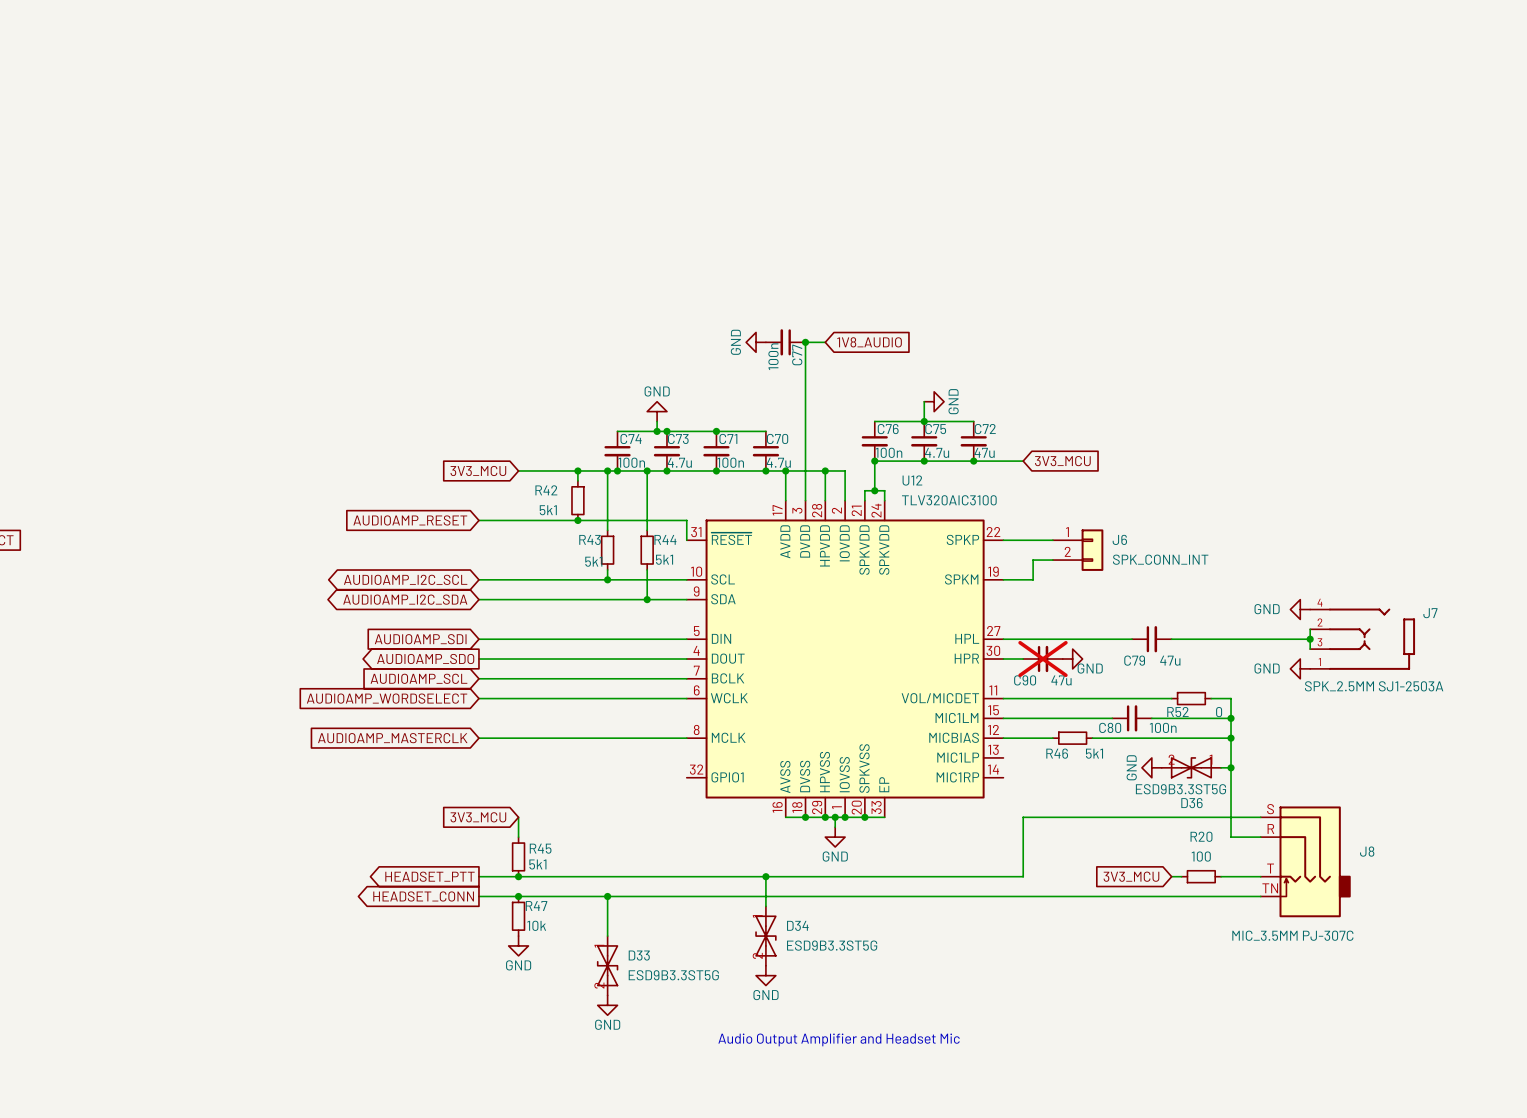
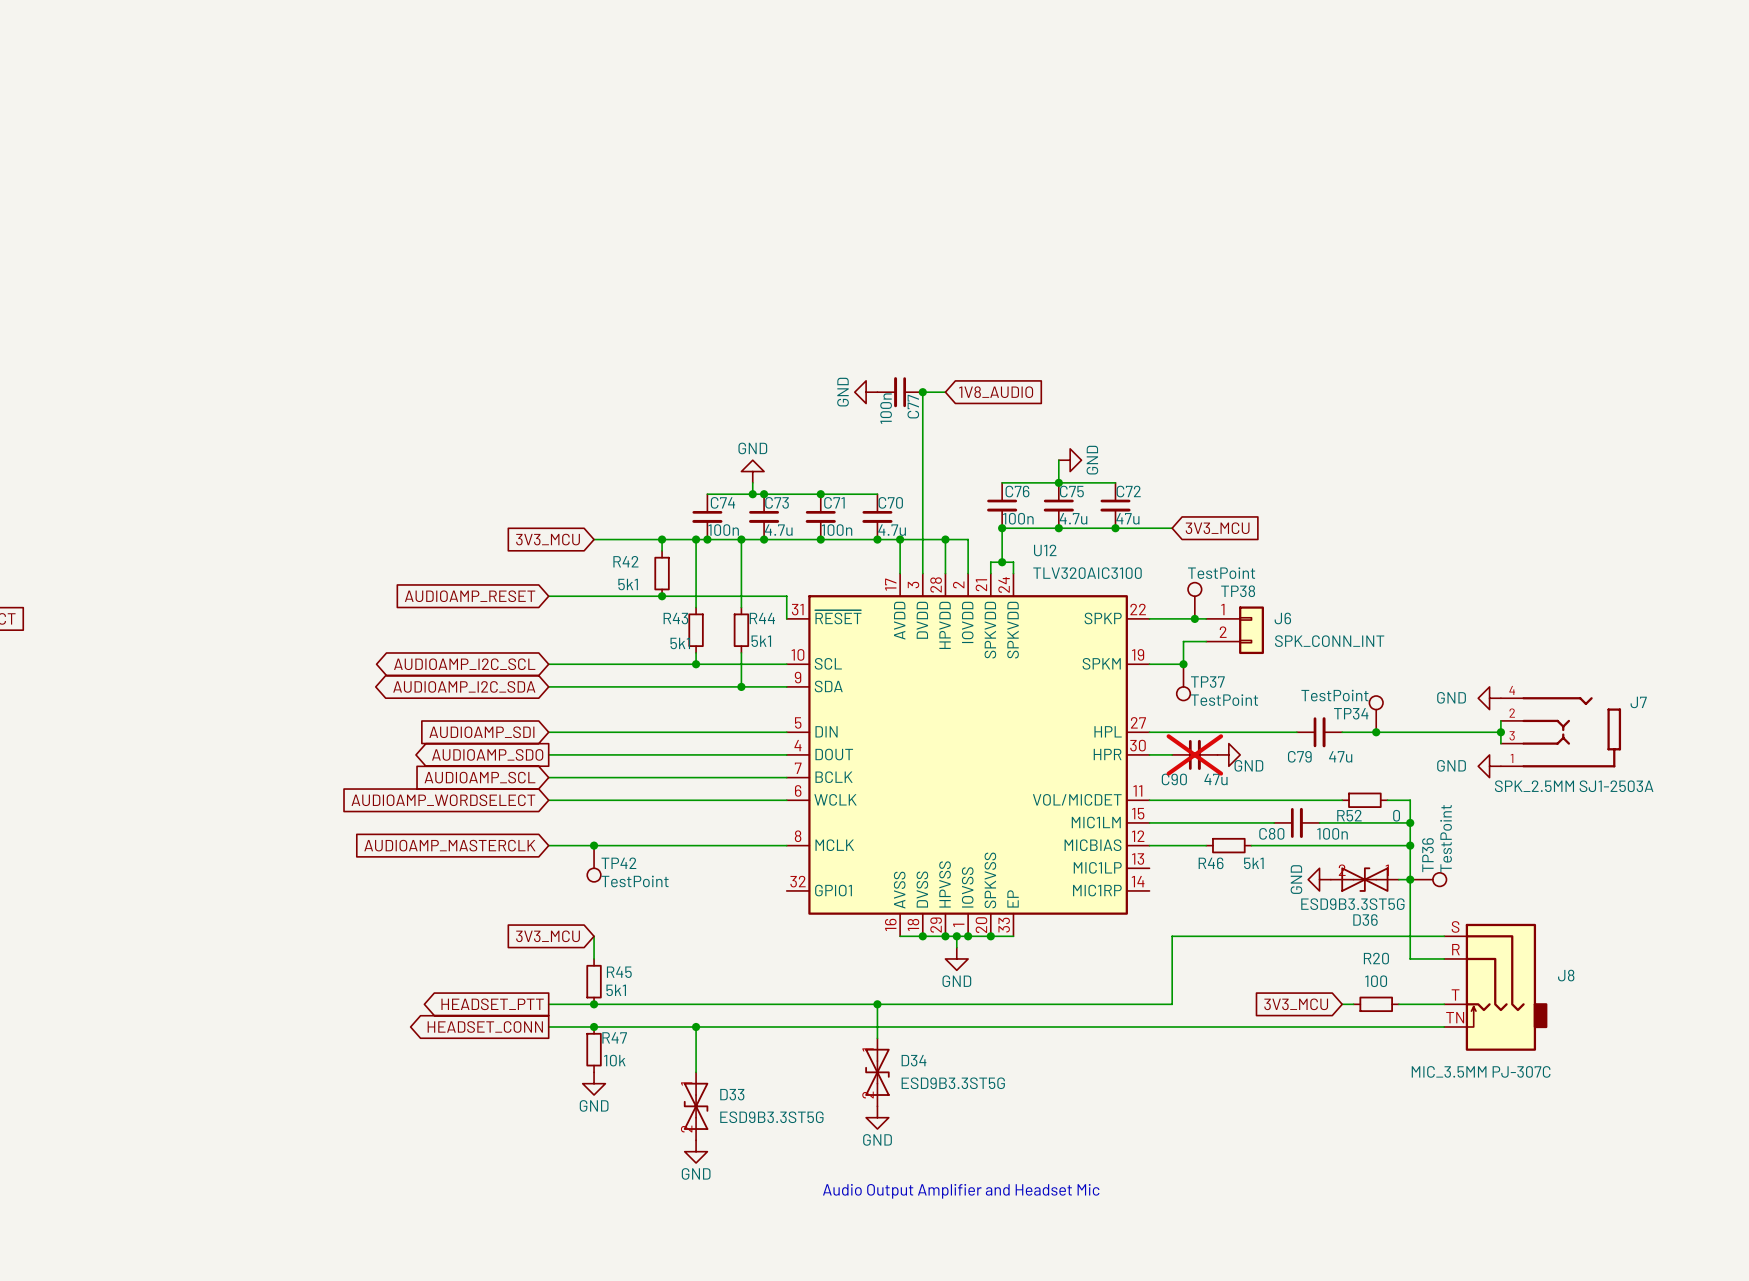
TP38: none -> TestPoint (1194, 600)
junction: none -> (1194, 618)
junction: none -> (1183, 664)
TP37: none -> TestPoint (1183, 682)
TP34: none -> TestPoint (1376, 714)
junction: none -> (1376, 732)
junction: none -> (594, 845)
TP42: none -> TestPoint (594, 863)
TP36: none -> TestPoint (1428, 879)

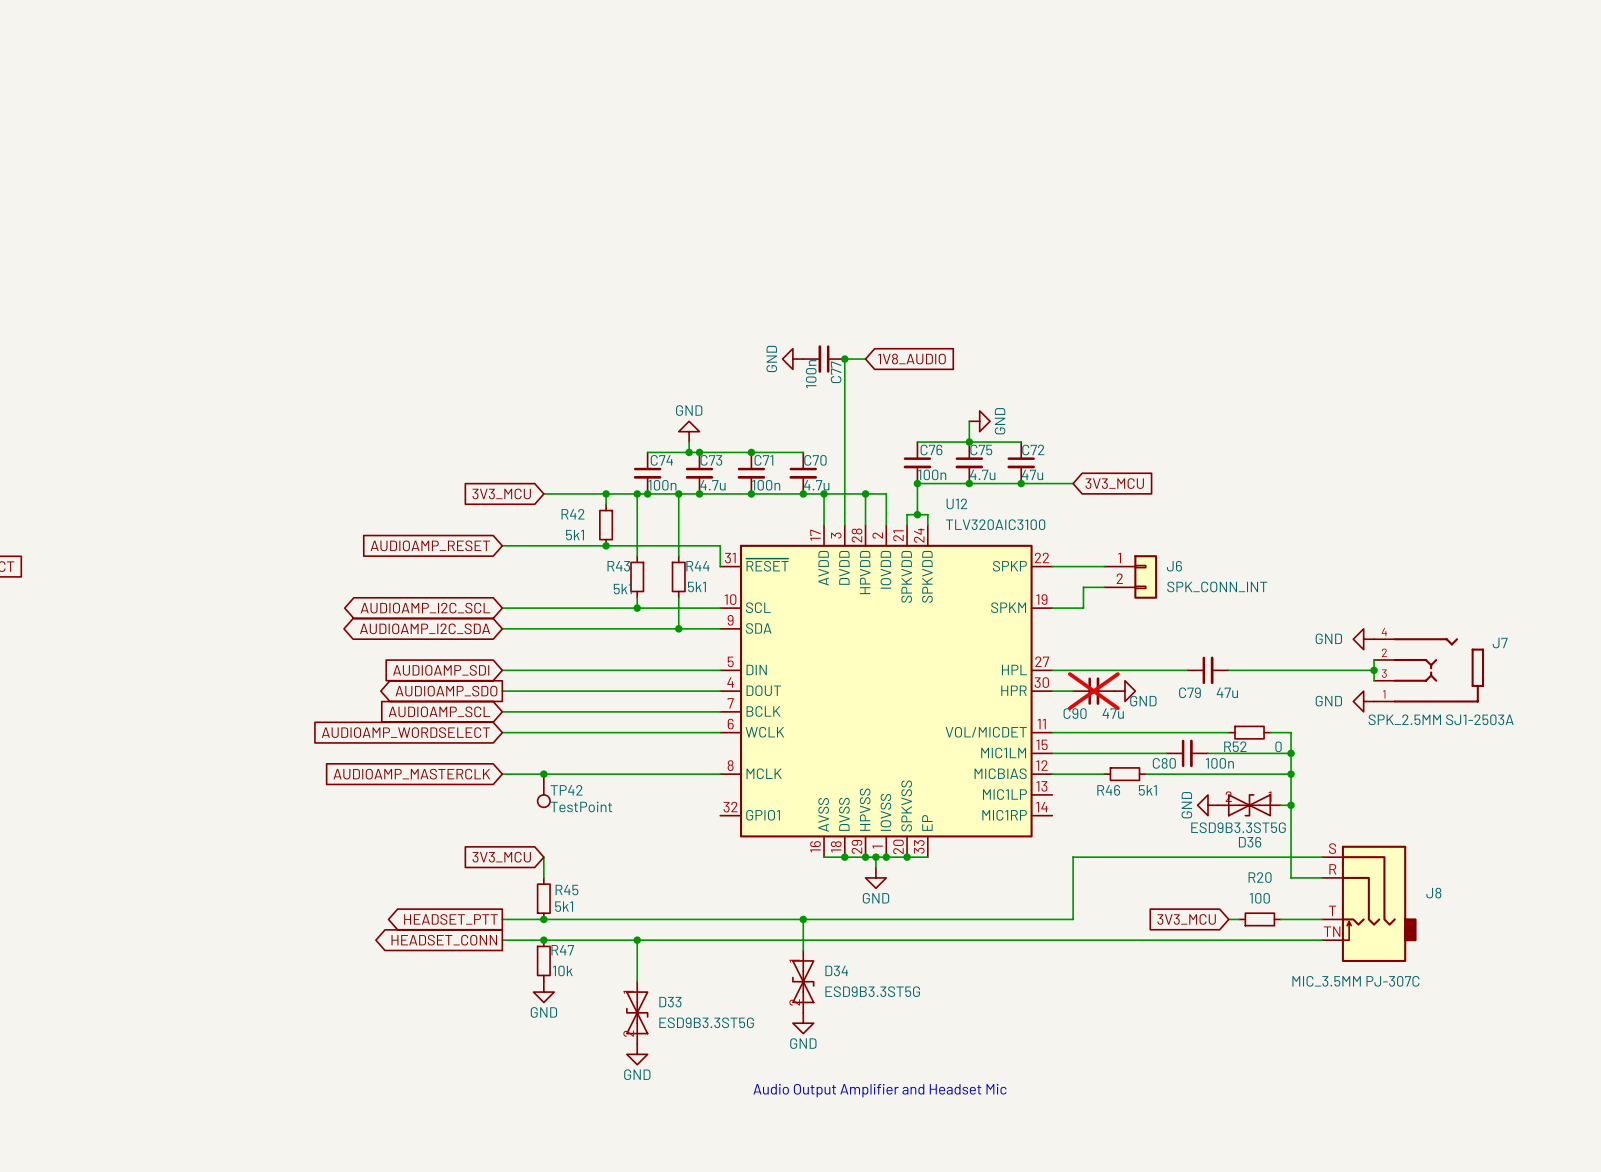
TP38: TestPoint (1194, 600) -> none
junction: (1194, 618) -> none
junction: (1183, 664) -> none
TP37: TestPoint (1183, 682) -> none
TP34: TestPoint (1376, 714) -> none
junction: (1376, 732) -> none
TP36: TestPoint (1428, 879) -> none

